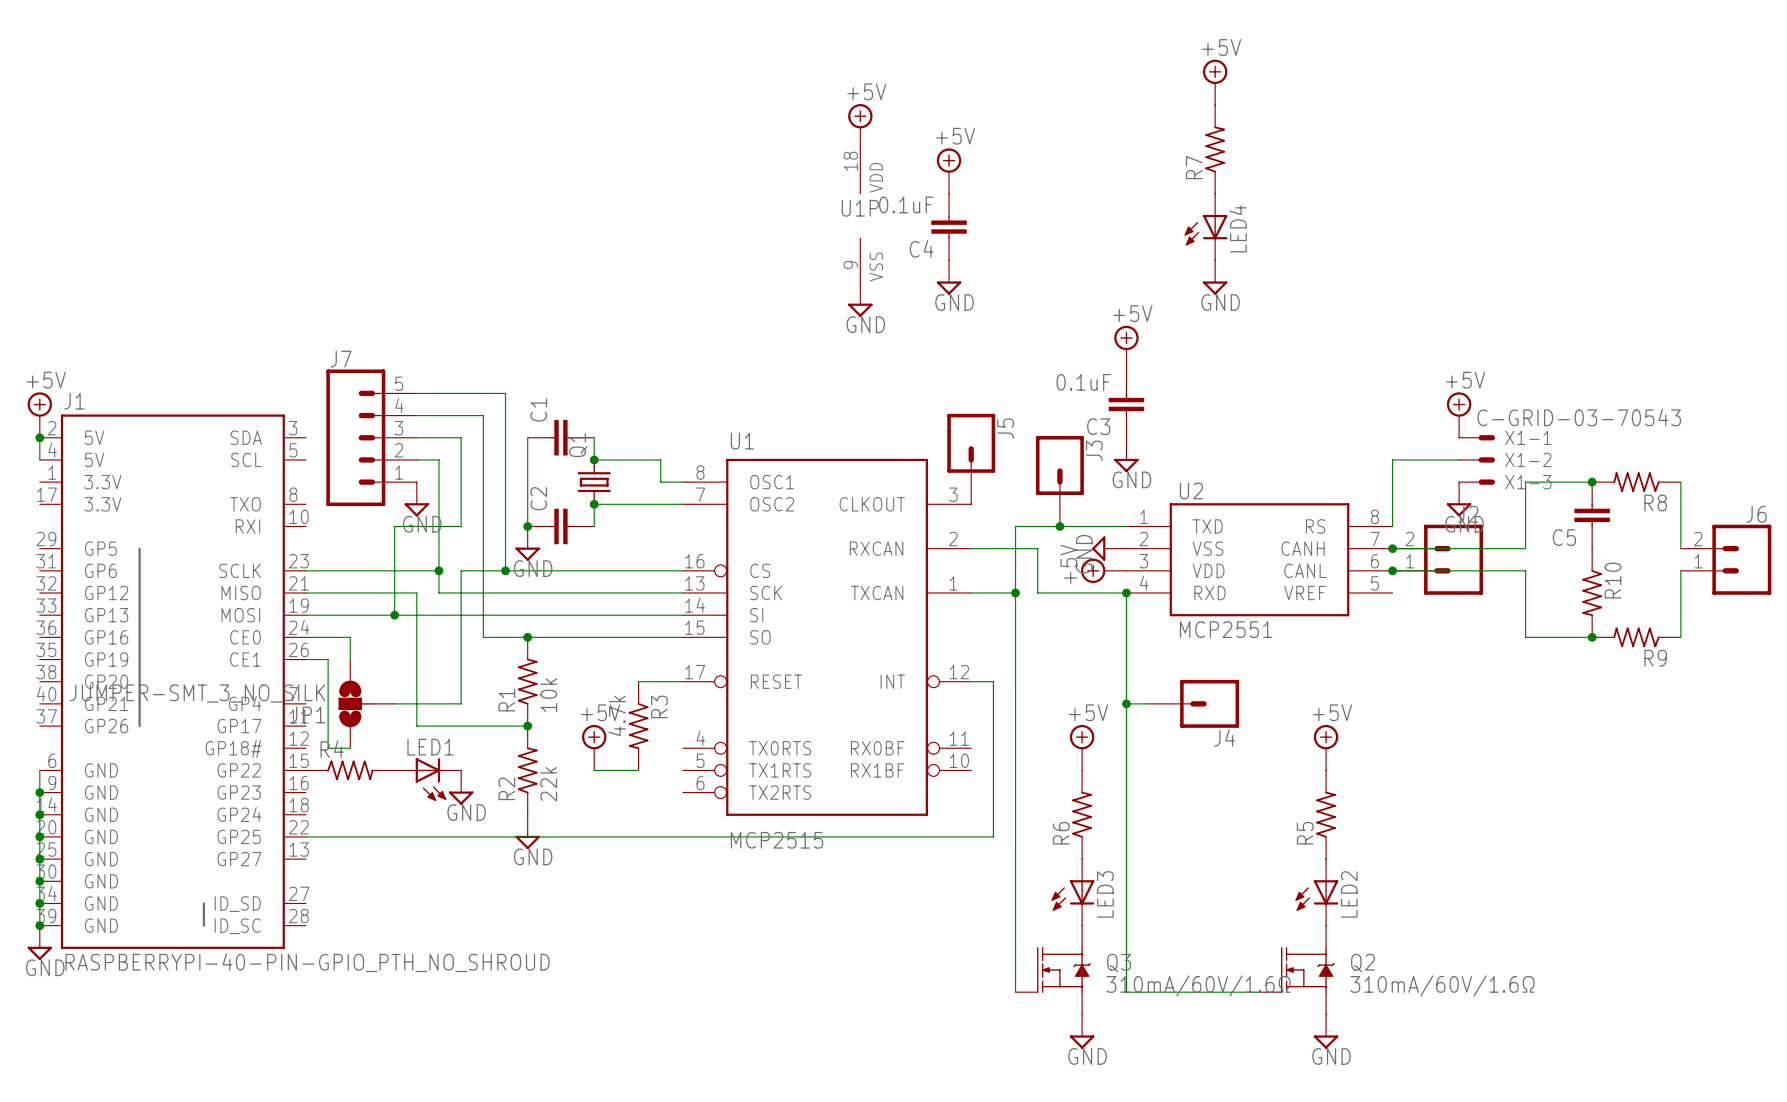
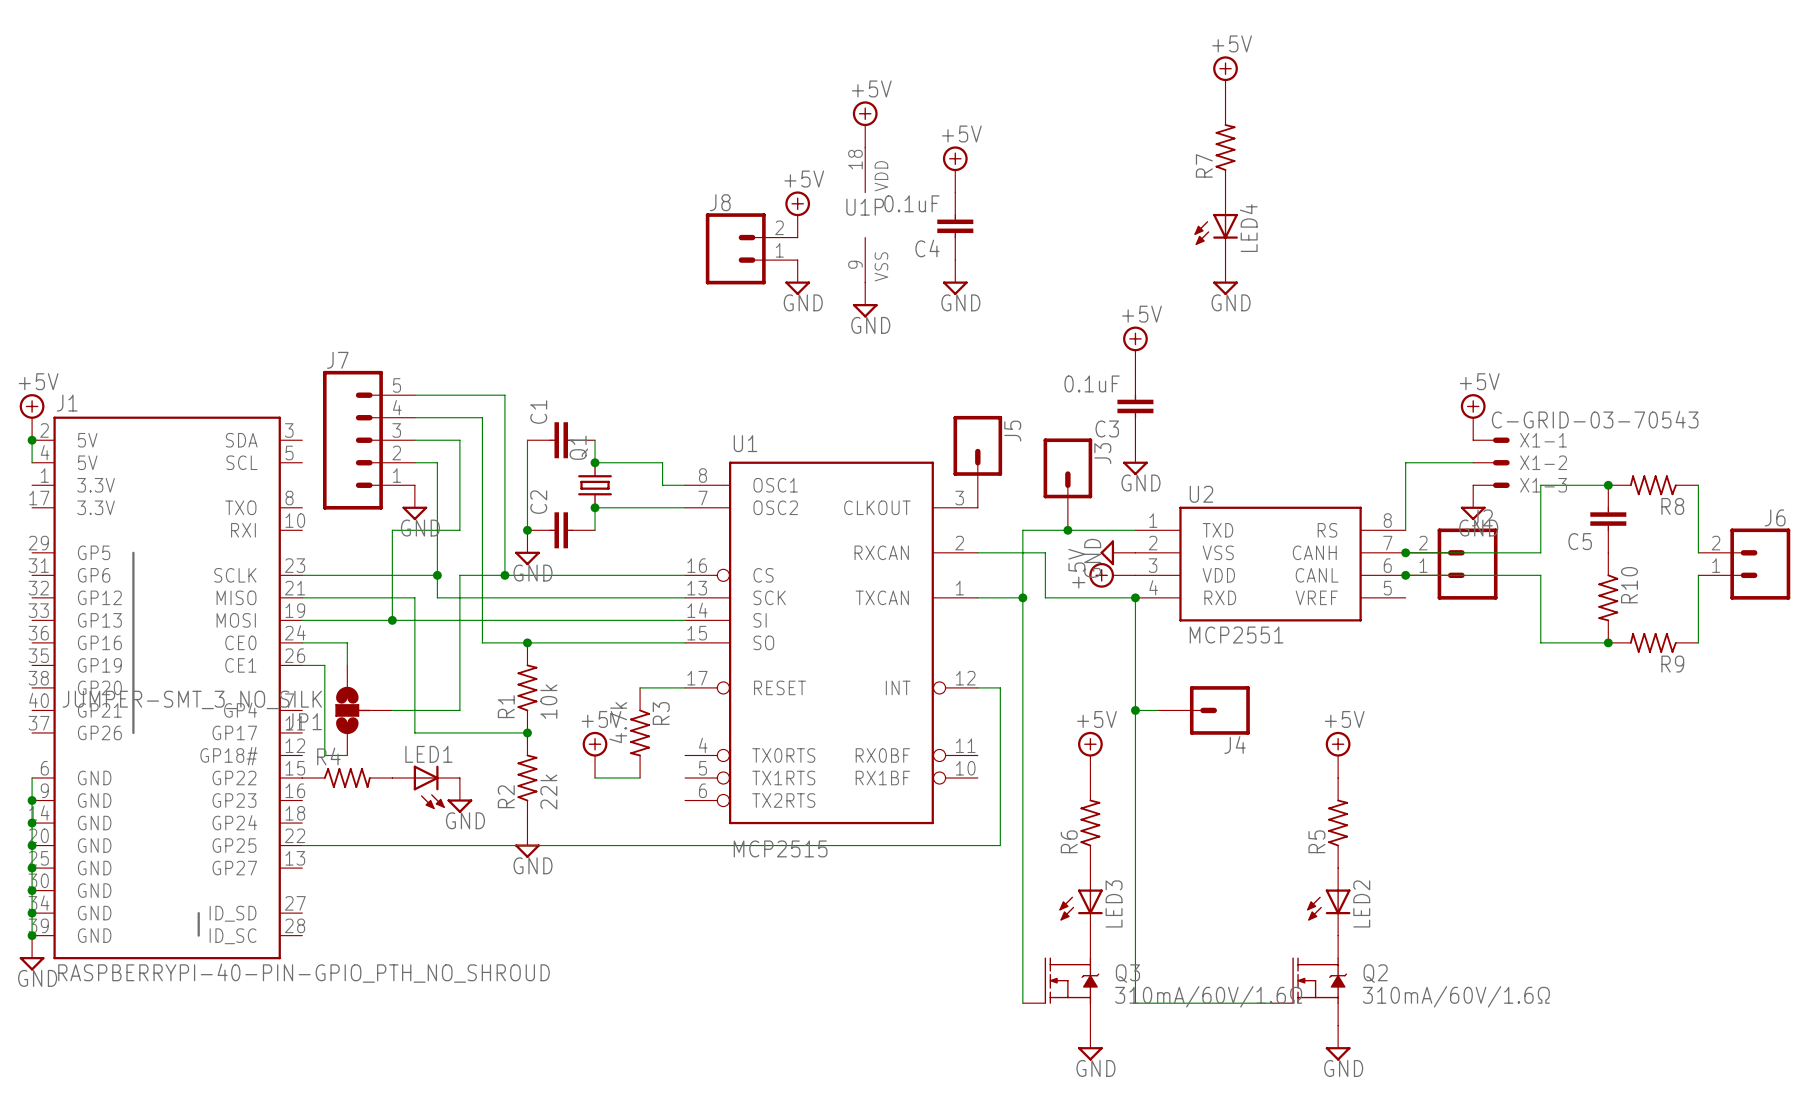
power symbol: none -> +5V (797, 214)
J8: none -> (751, 248)
power symbol: none -> GND (797, 277)

